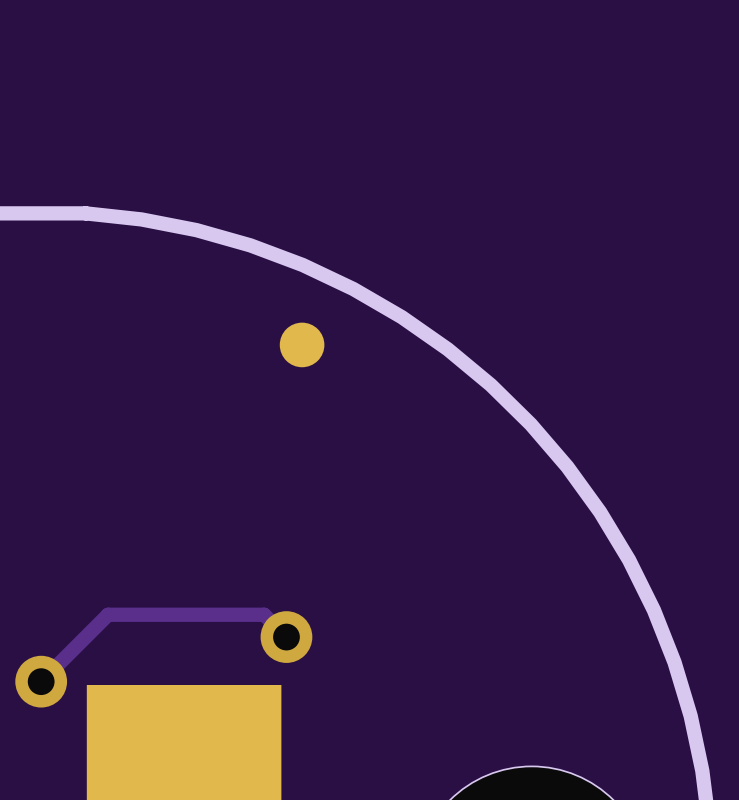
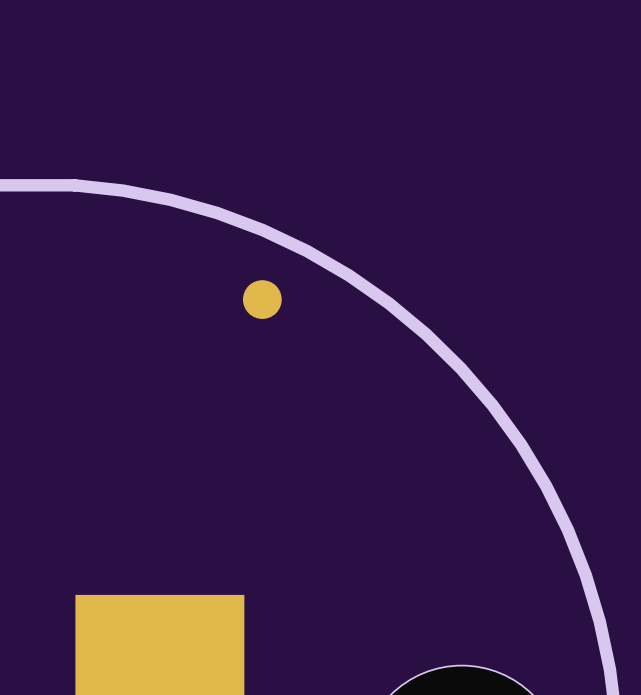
track: (286, 637) (264, 614) (108, 614) (41, 681) -> none
via: (286, 637) -> none
via: (41, 681) -> none

